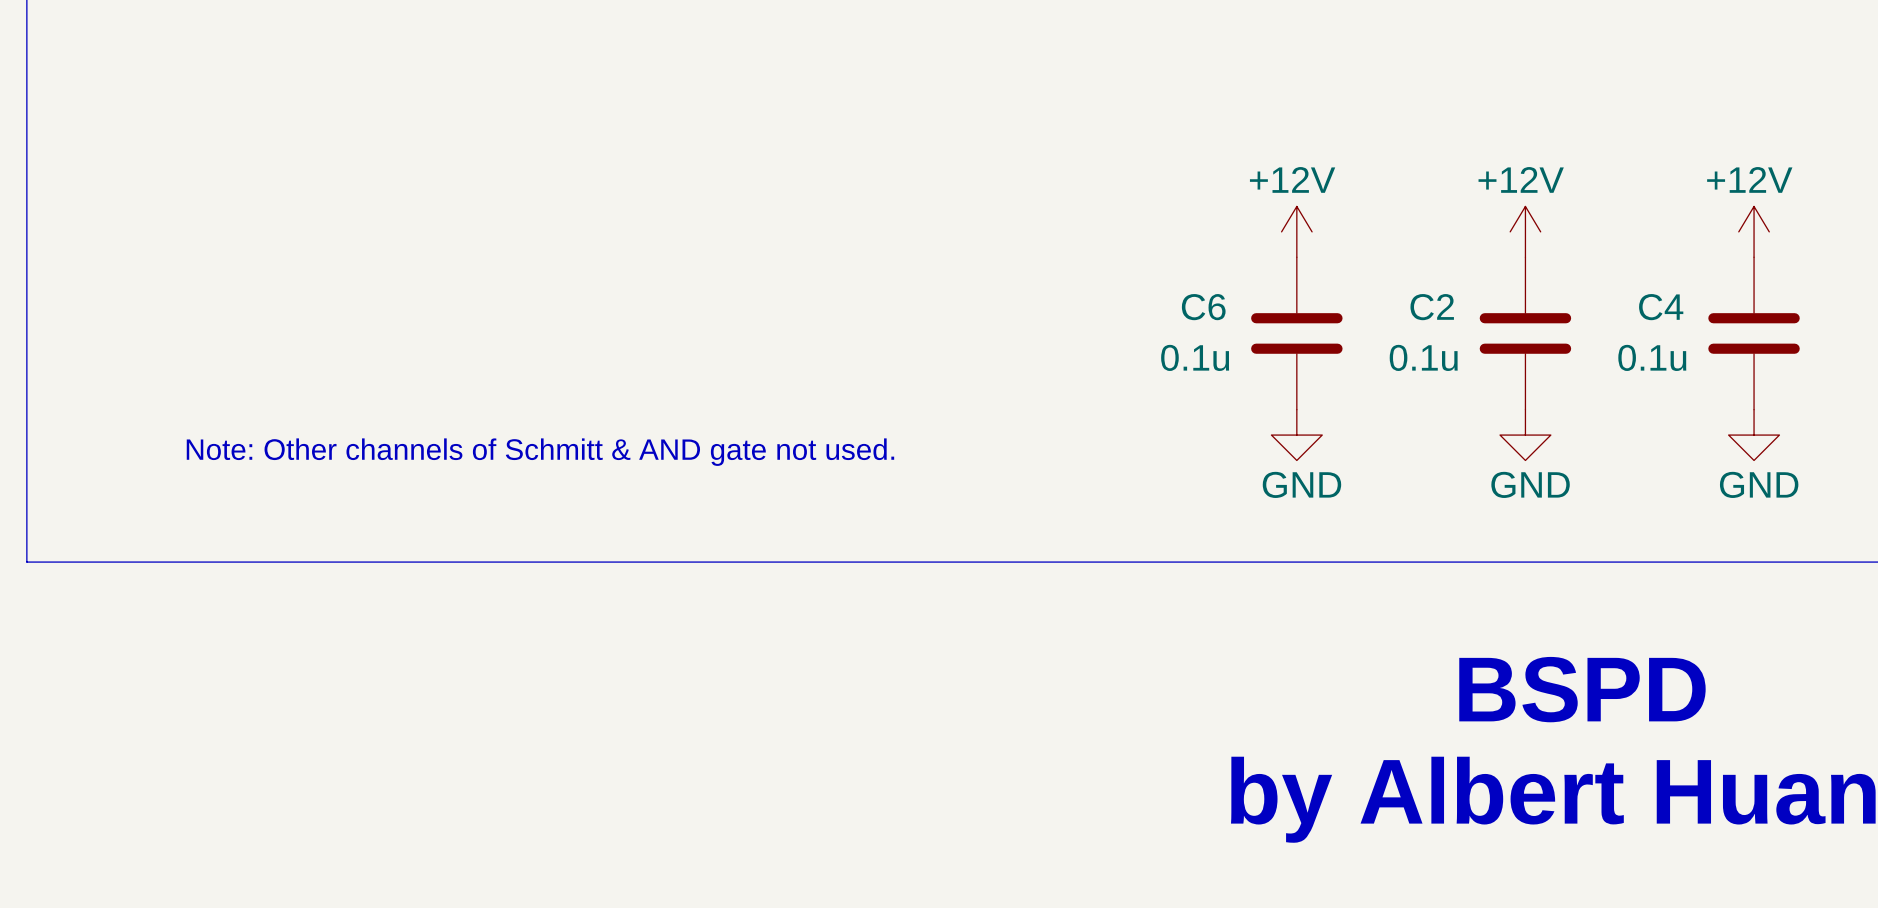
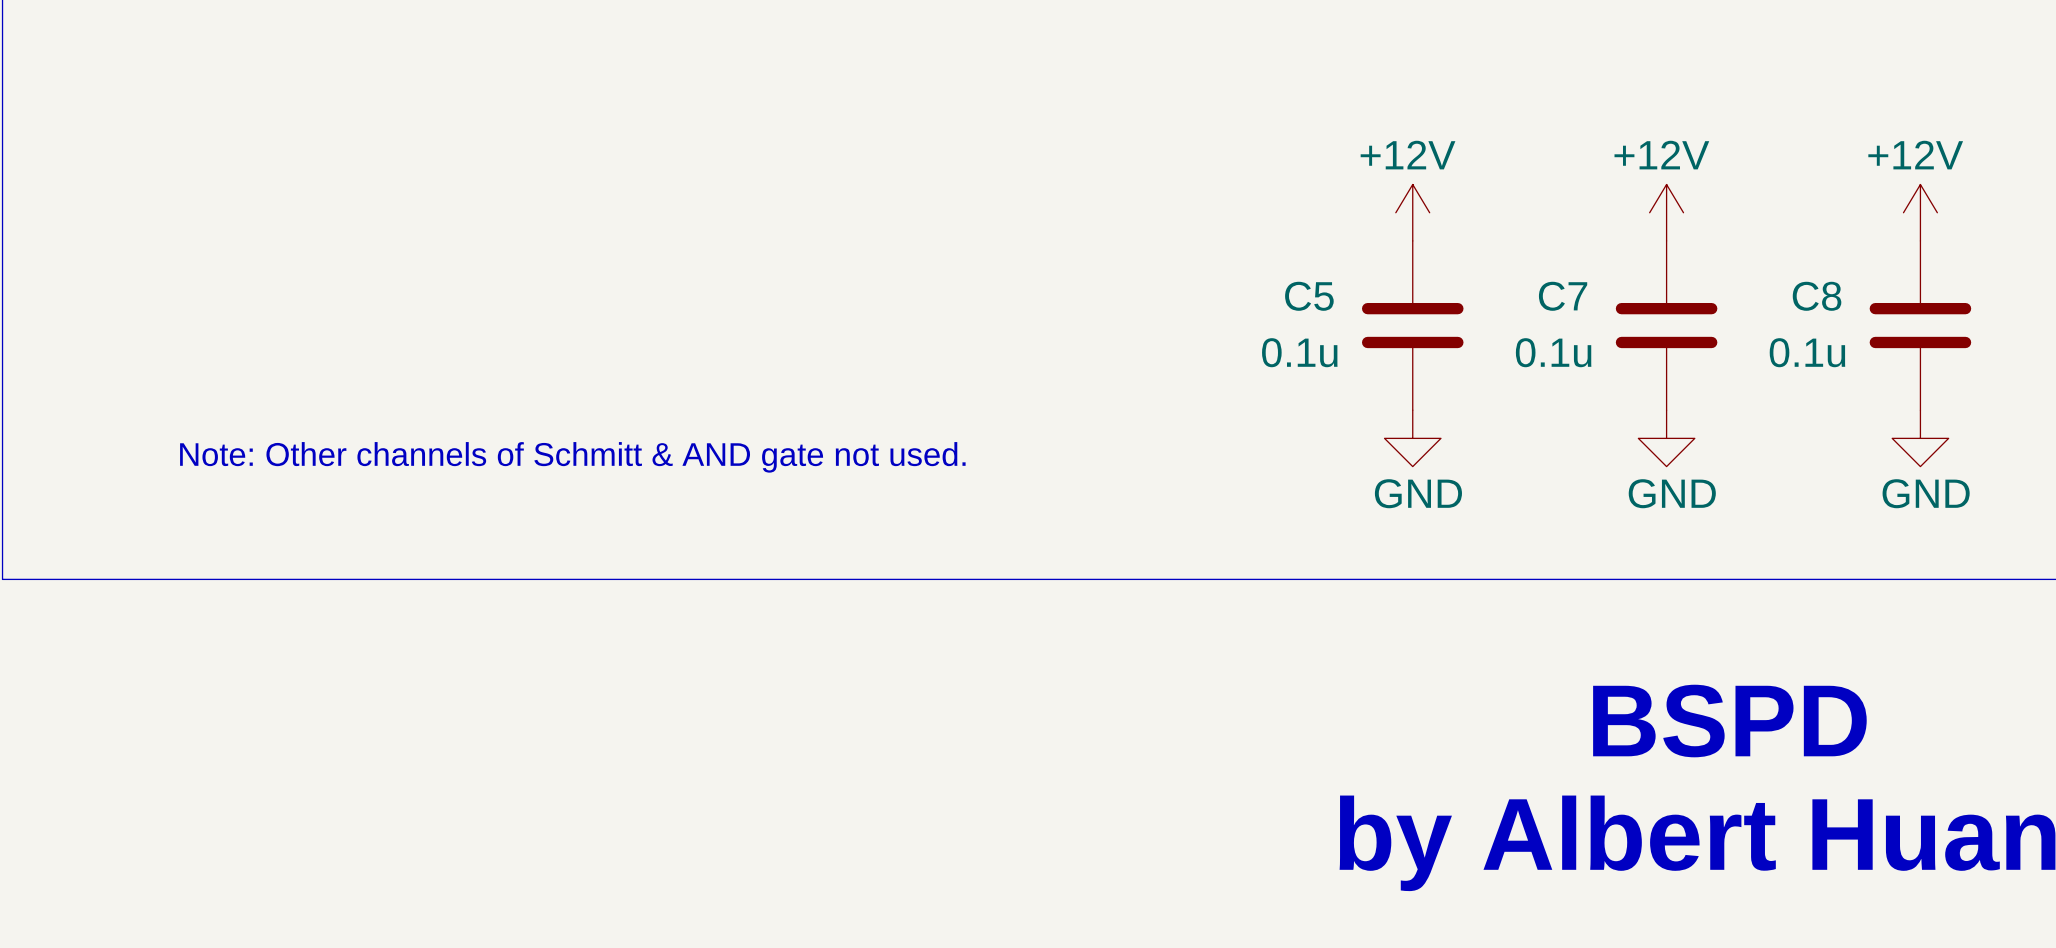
C6 name: C6 (1203, 307) -> C5 (1309, 296)
C2 name: C2 (1432, 307) -> C7 (1563, 296)
C4 name: C4 (1661, 307) -> C8 (1817, 296)

